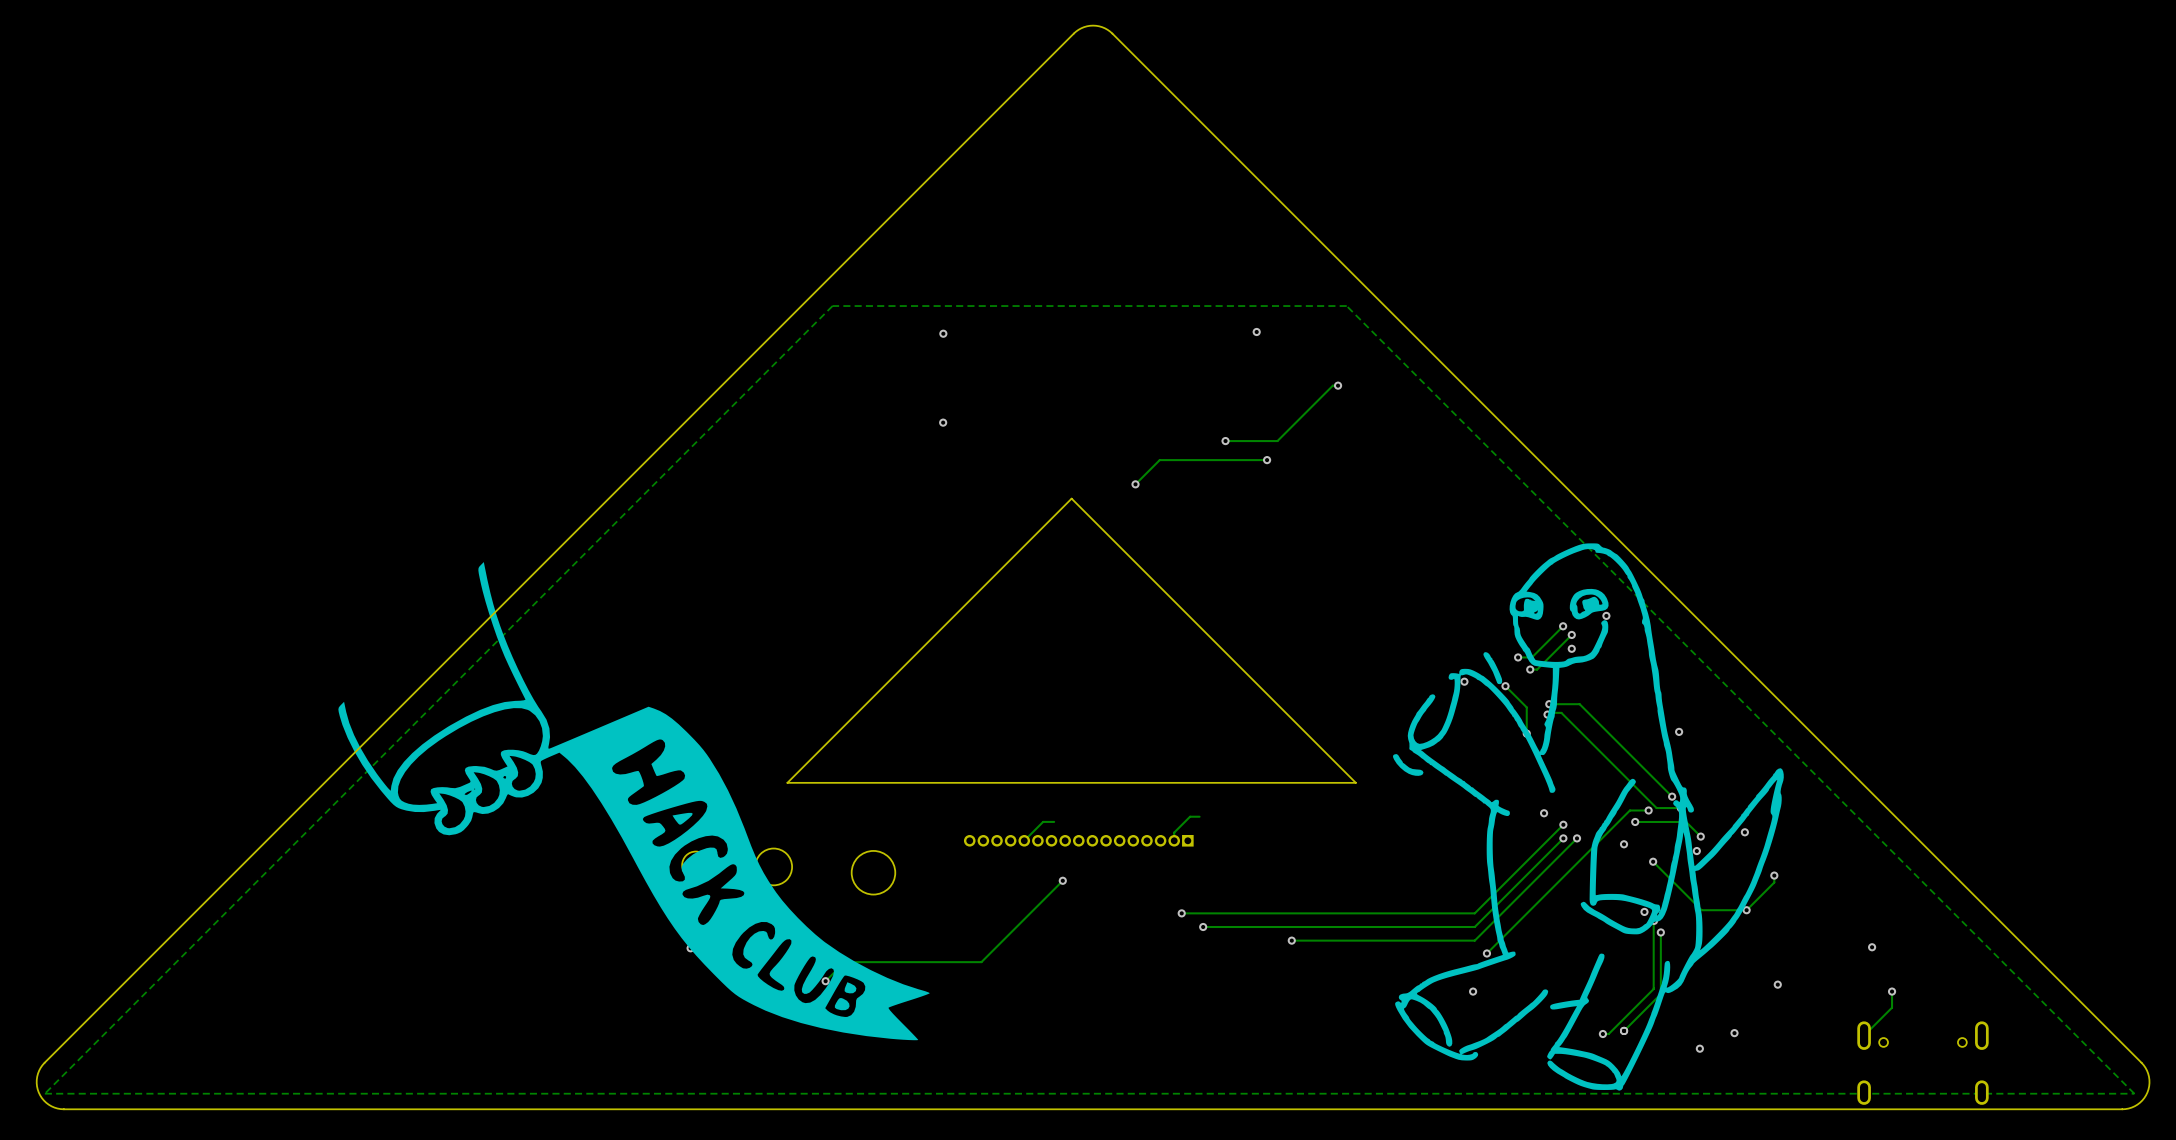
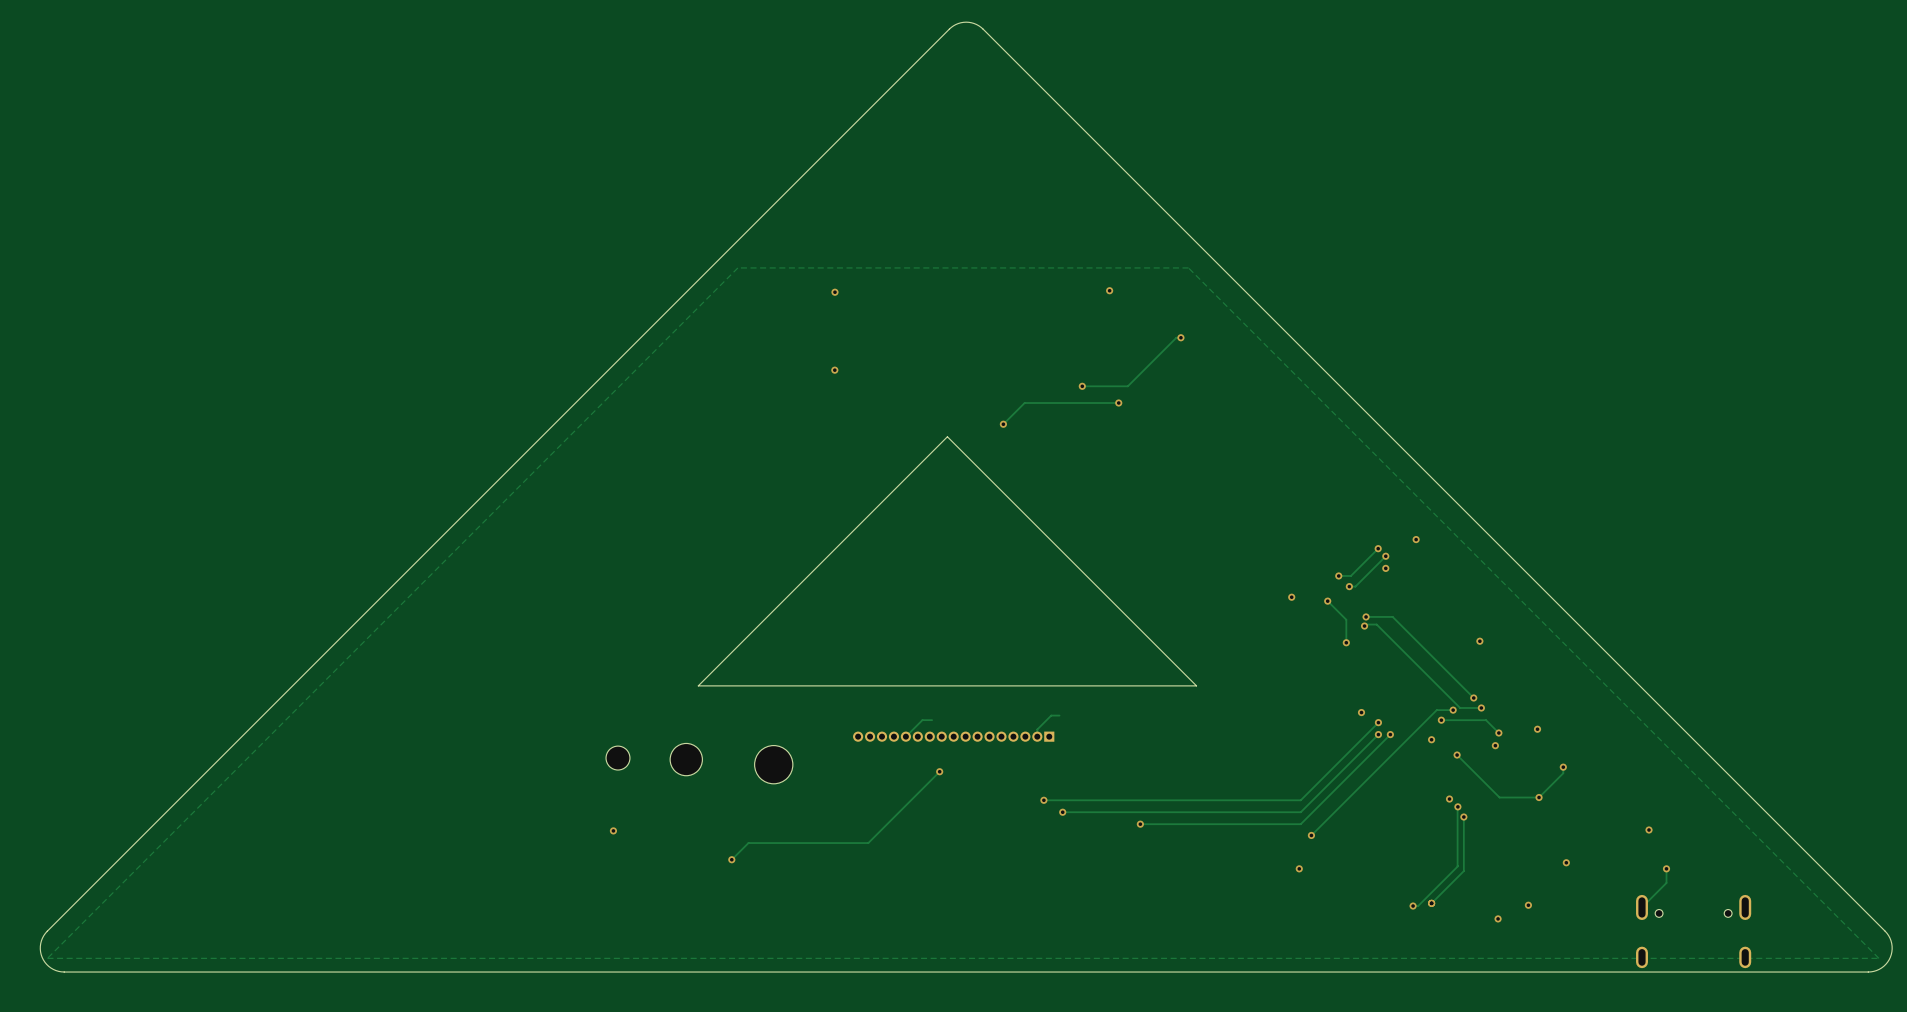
drawing: [1393, 543, 1784, 1091] -> none
drawing: [338, 562, 930, 1041] -> none

